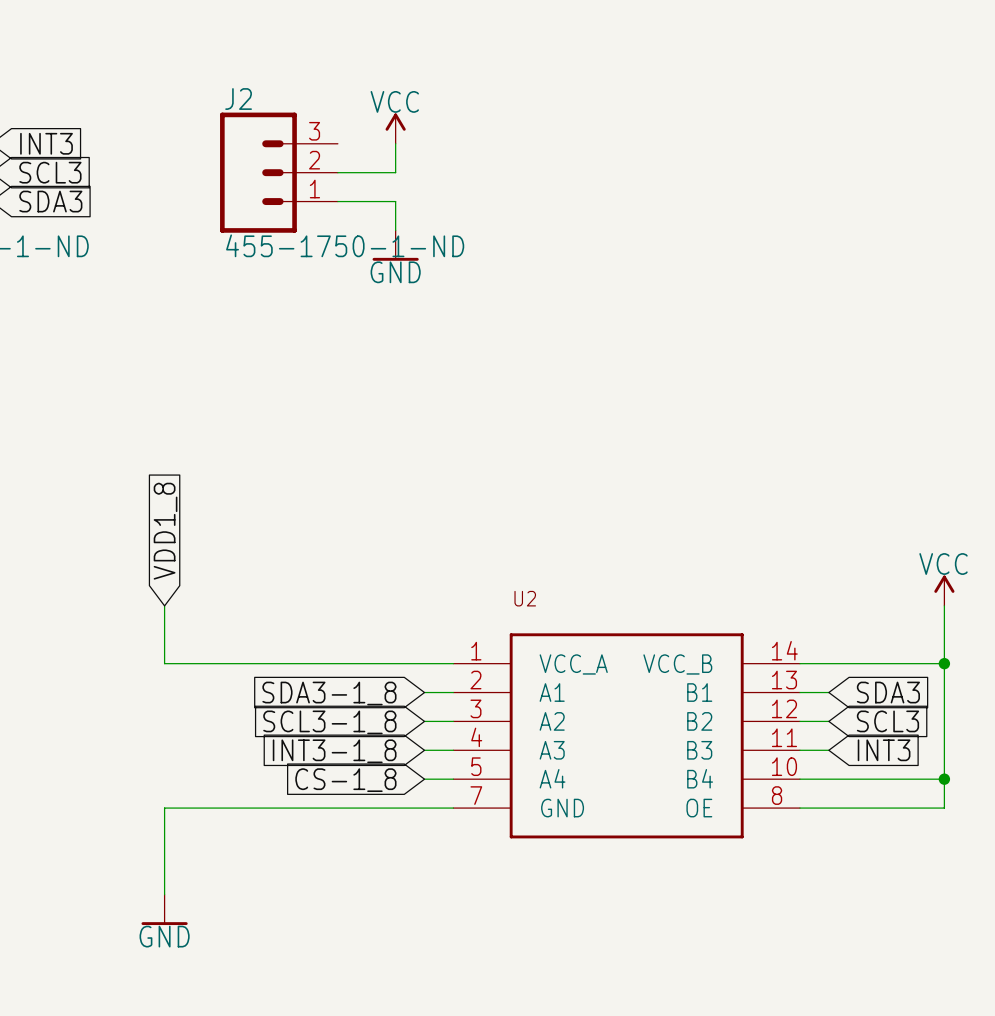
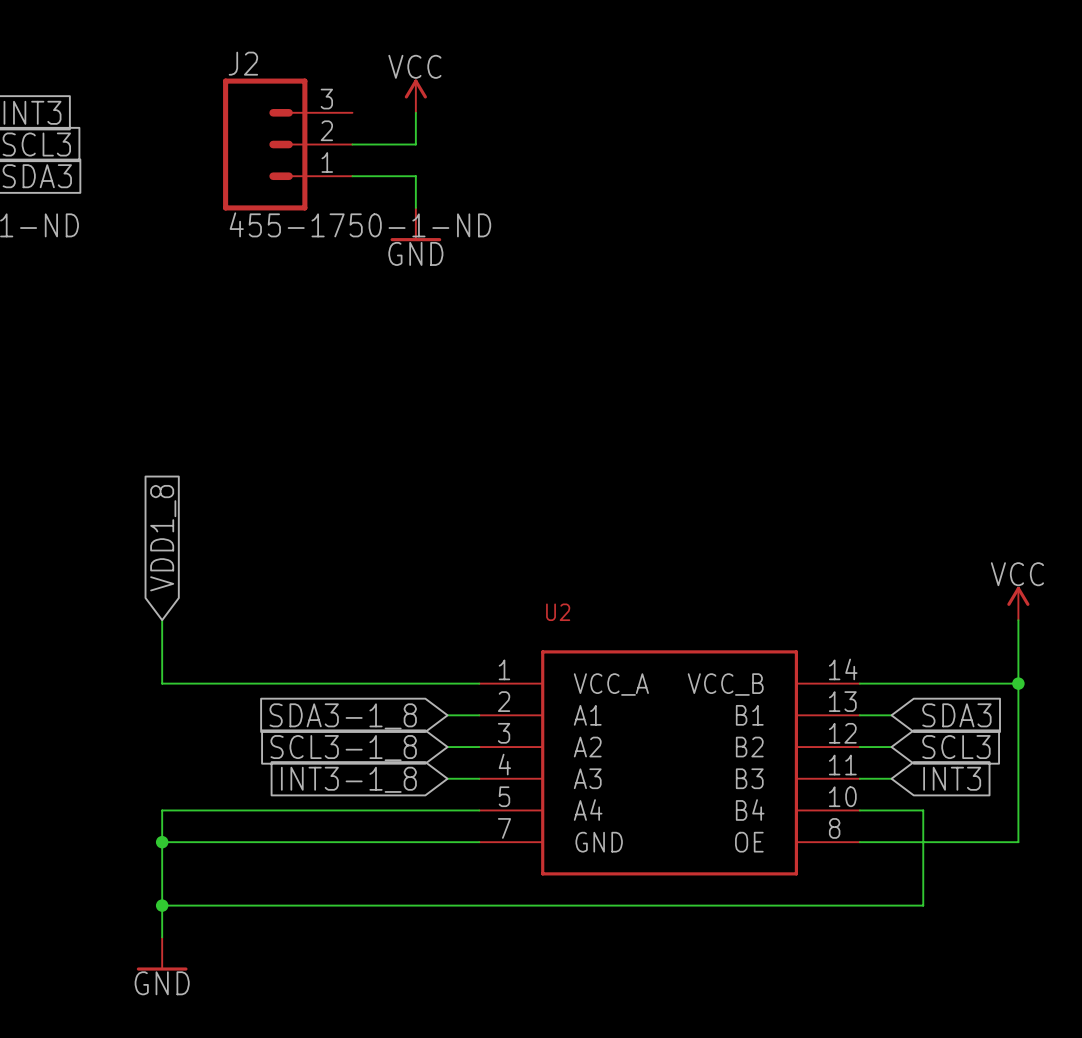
wire: none -> (447, 810) (162, 810) (162, 842)
wire: (857, 779) (944, 779) -> (923, 810) (923, 905) (162, 905)
junction: (944, 779) -> none
global label: CS-1_8 (345, 780) -> none
junction: none -> (162, 842)
junction: none -> (162, 905)

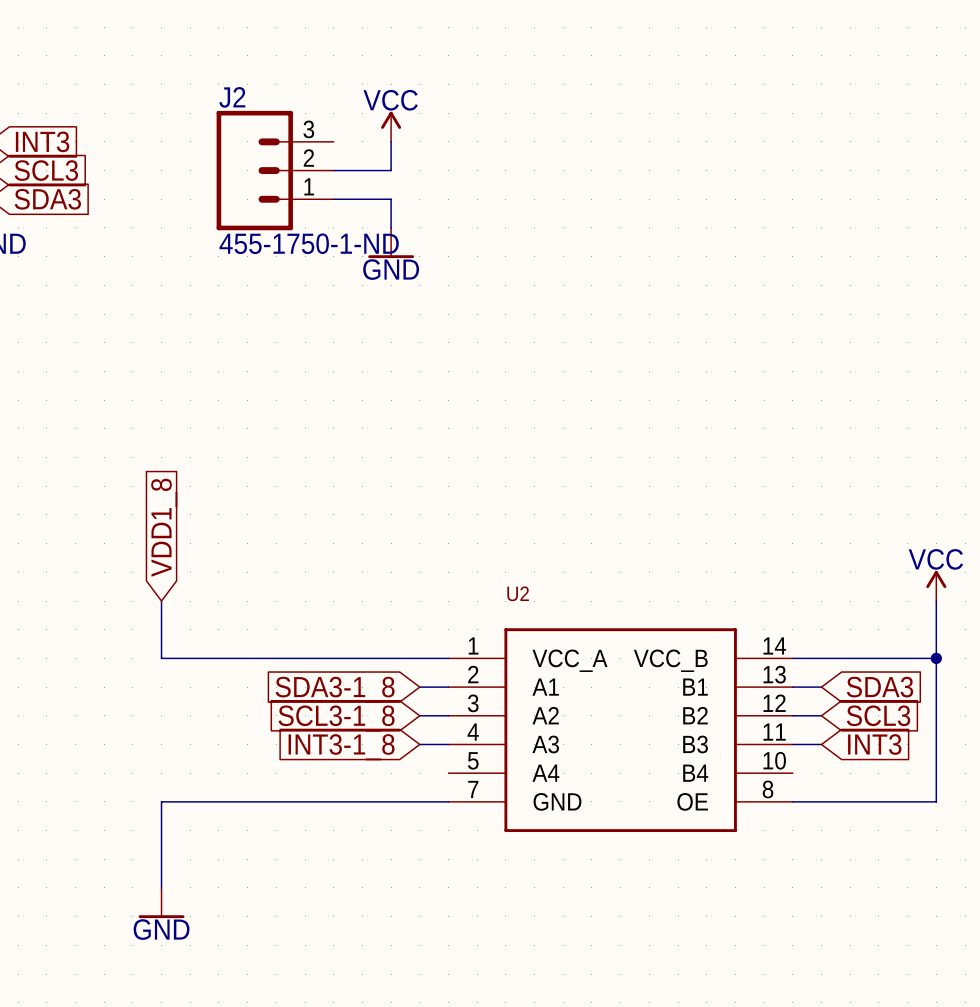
wire: (479, 810) (162, 810) (162, 842) -> none
wire: (859, 810) (923, 810) (923, 905) (162, 905) -> none
junction: (162, 842) -> none
junction: (162, 905) -> none

